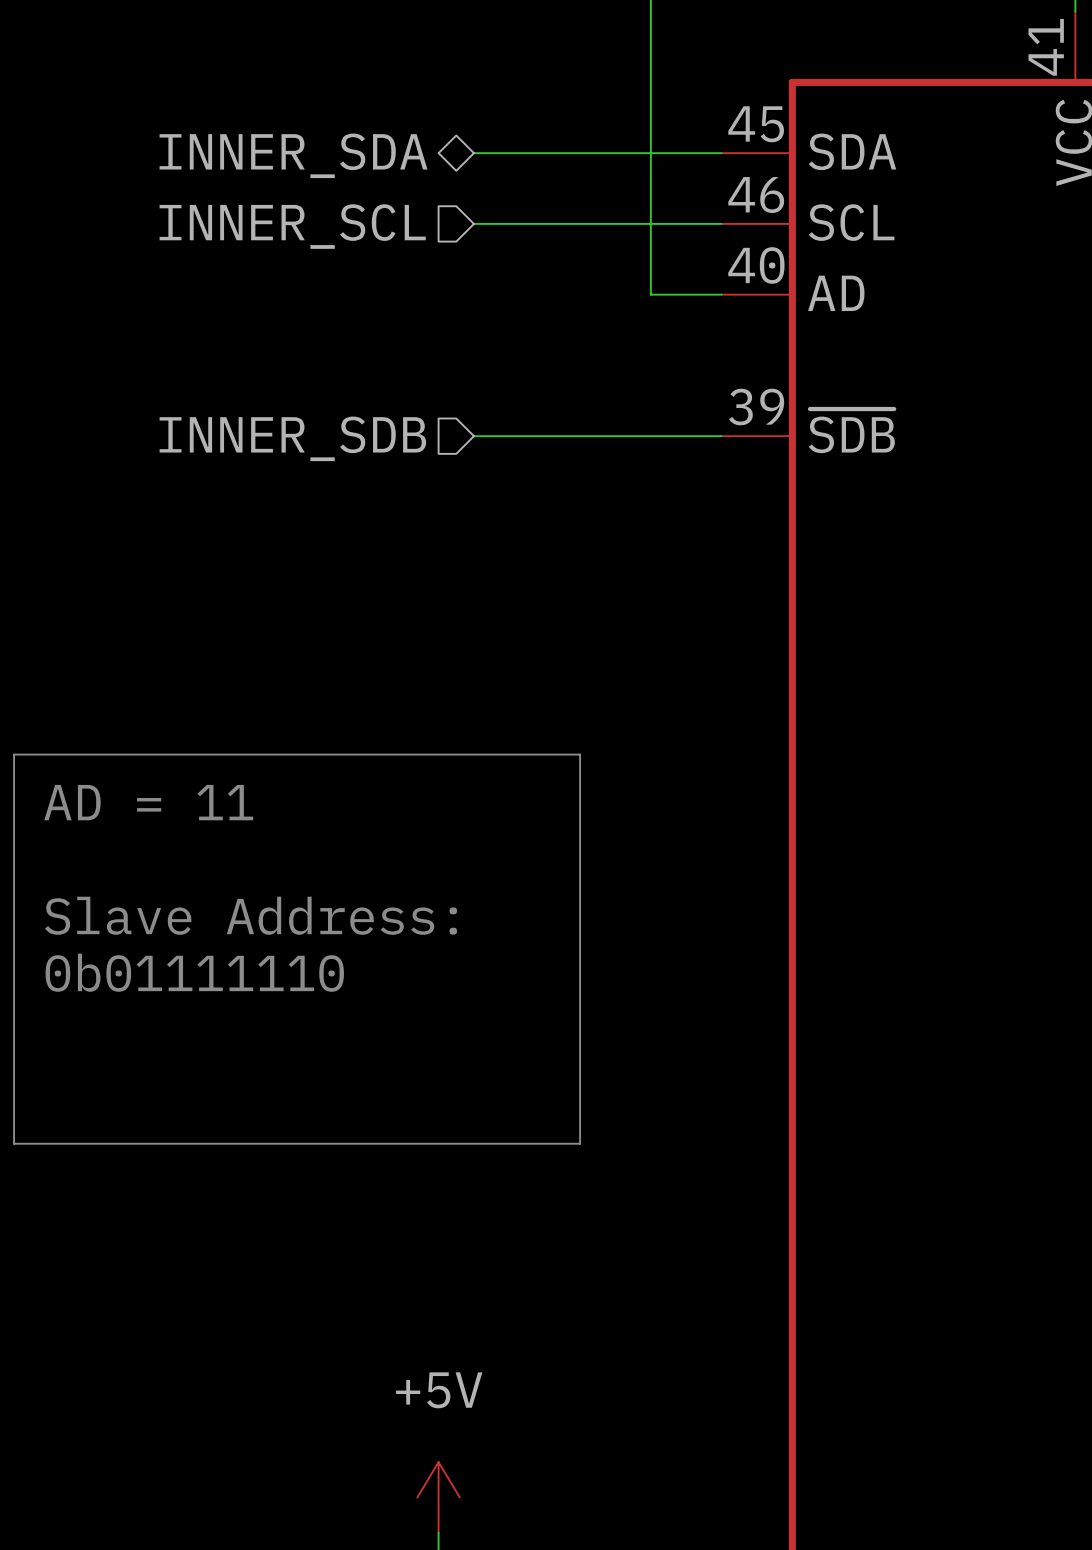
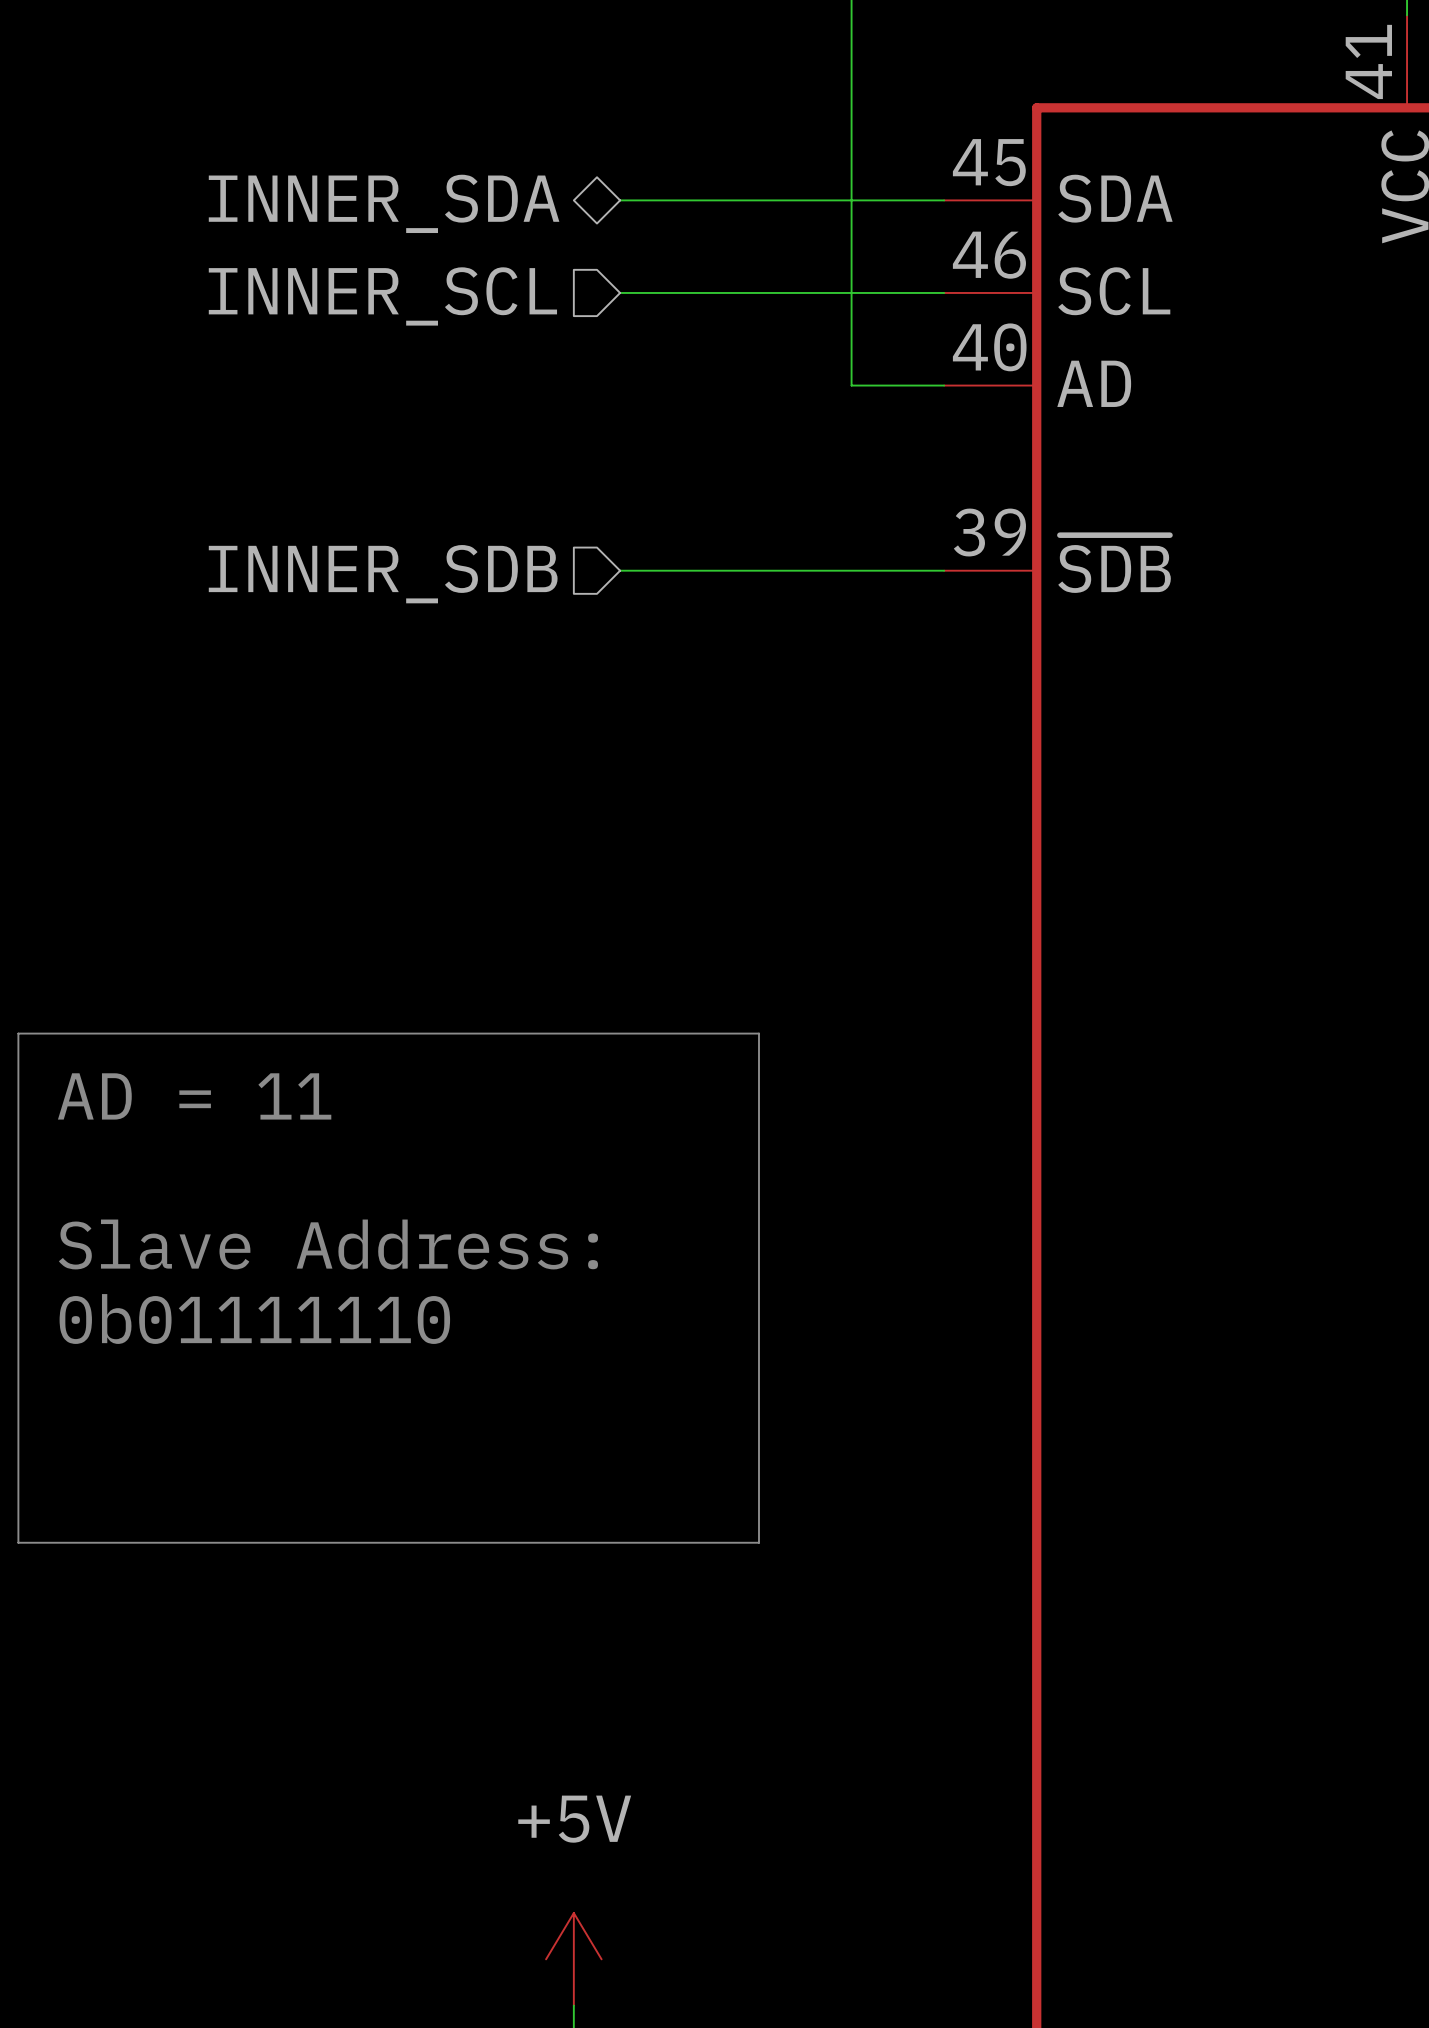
line: (14, 789) (14, 754) (580, 754) (580, 789) -> (18, 1033) (758, 1033)
text position: AD = 11 (148, 802) -> AD = 11 (194, 1096)
text position: Slave Address: (251, 915) -> Slave Address: (328, 1244)
text position: 0b01111110 (194, 972) -> 0b01111110 (254, 1319)
line: (14, 1143) (580, 1143) -> (18, 1496) (18, 1542) (758, 1542) (758, 1496)

